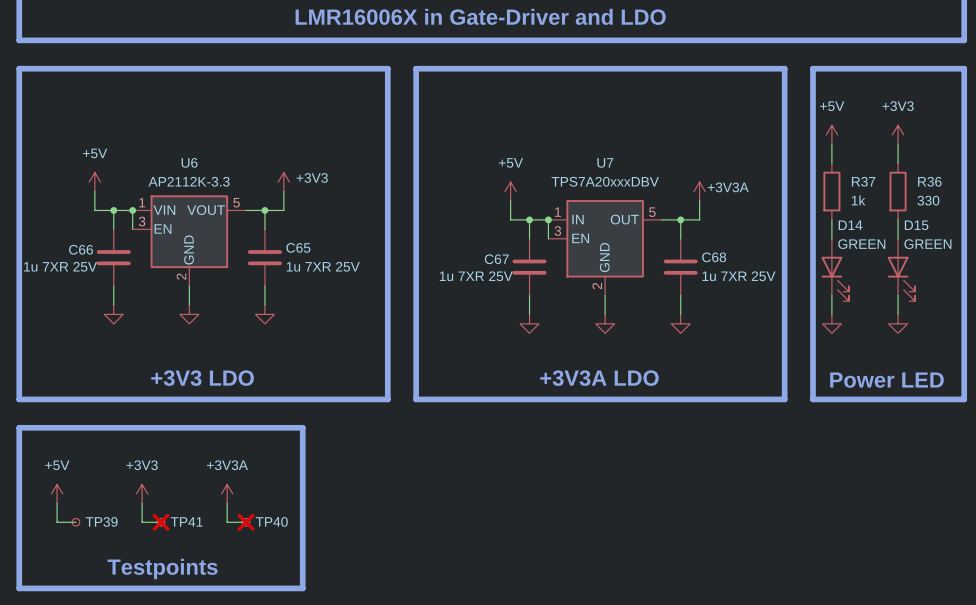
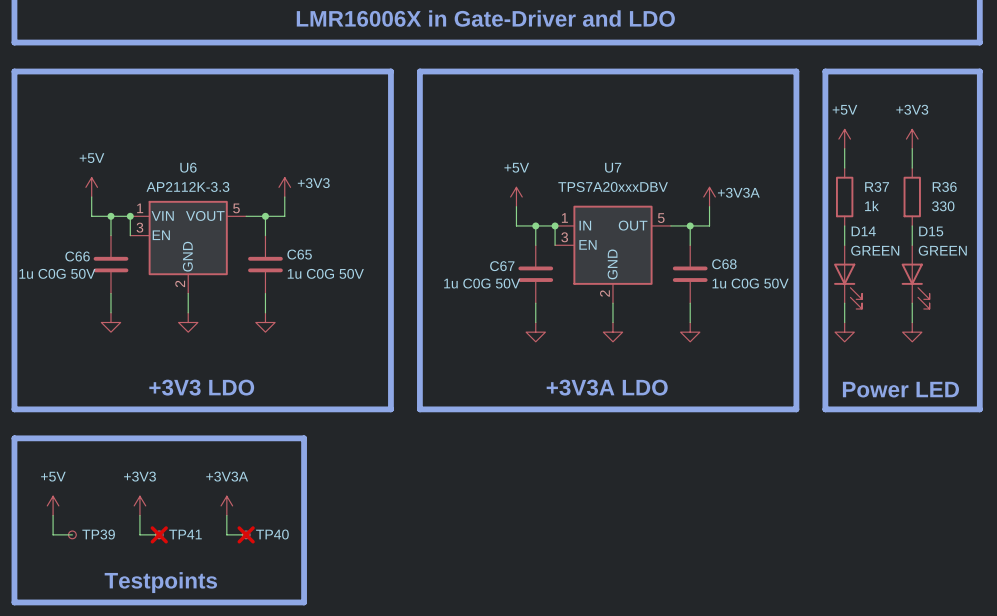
C66 value: 1u 7XR 25V (60, 266) -> 1u C0G 50V (57, 273)
C65 value: 1u 7XR 25V (323, 266) -> 1u C0G 50V (325, 273)
C67 value: 1u 7XR 25V (476, 276) -> 1u C0G 50V (482, 283)
C68 value: 1u 7XR 25V (739, 276) -> 1u C0G 50V (750, 283)

